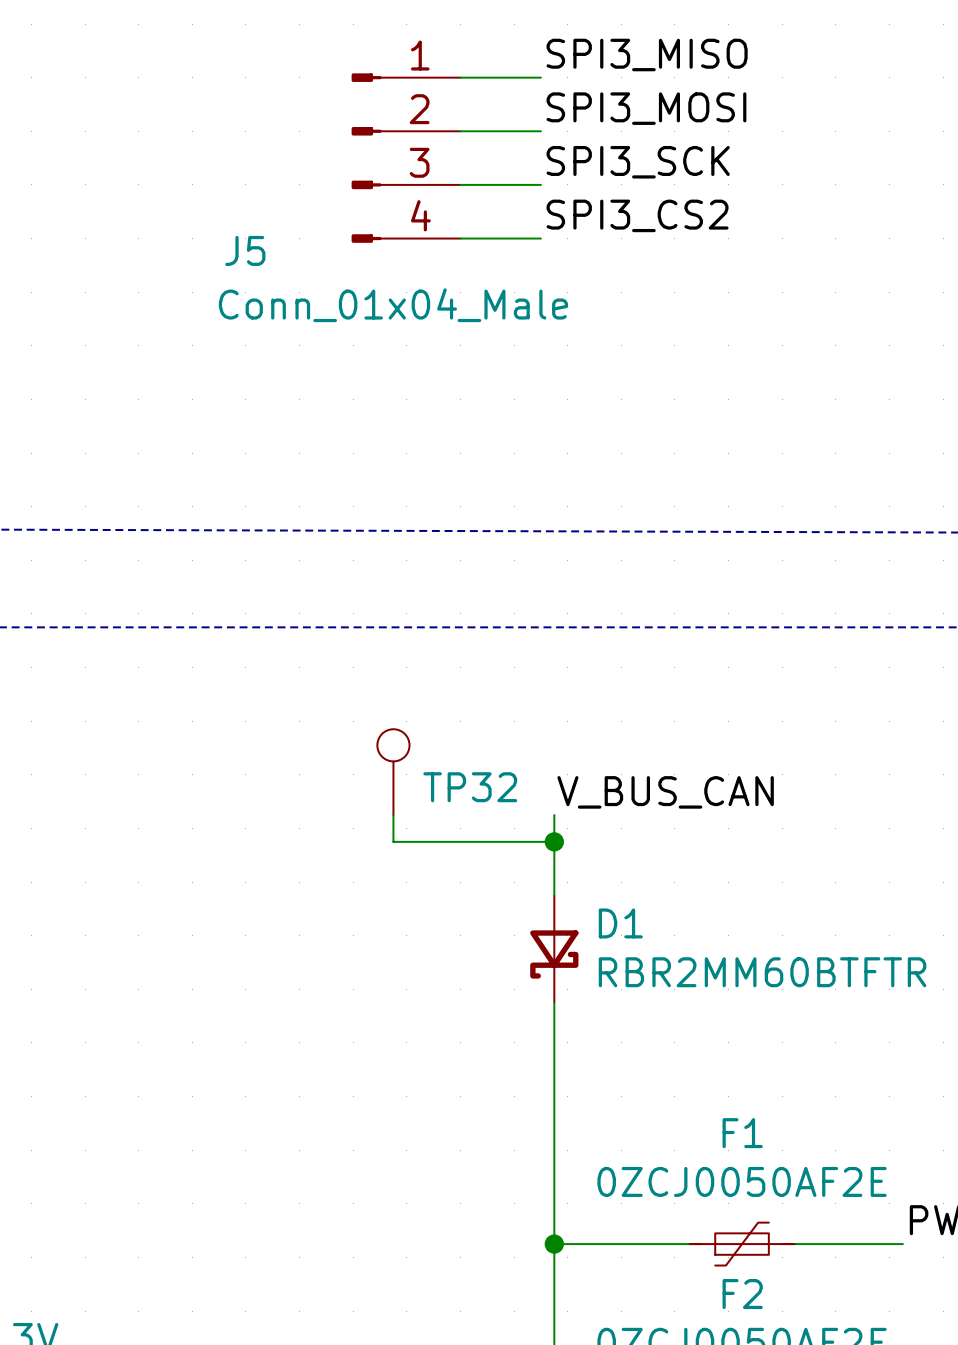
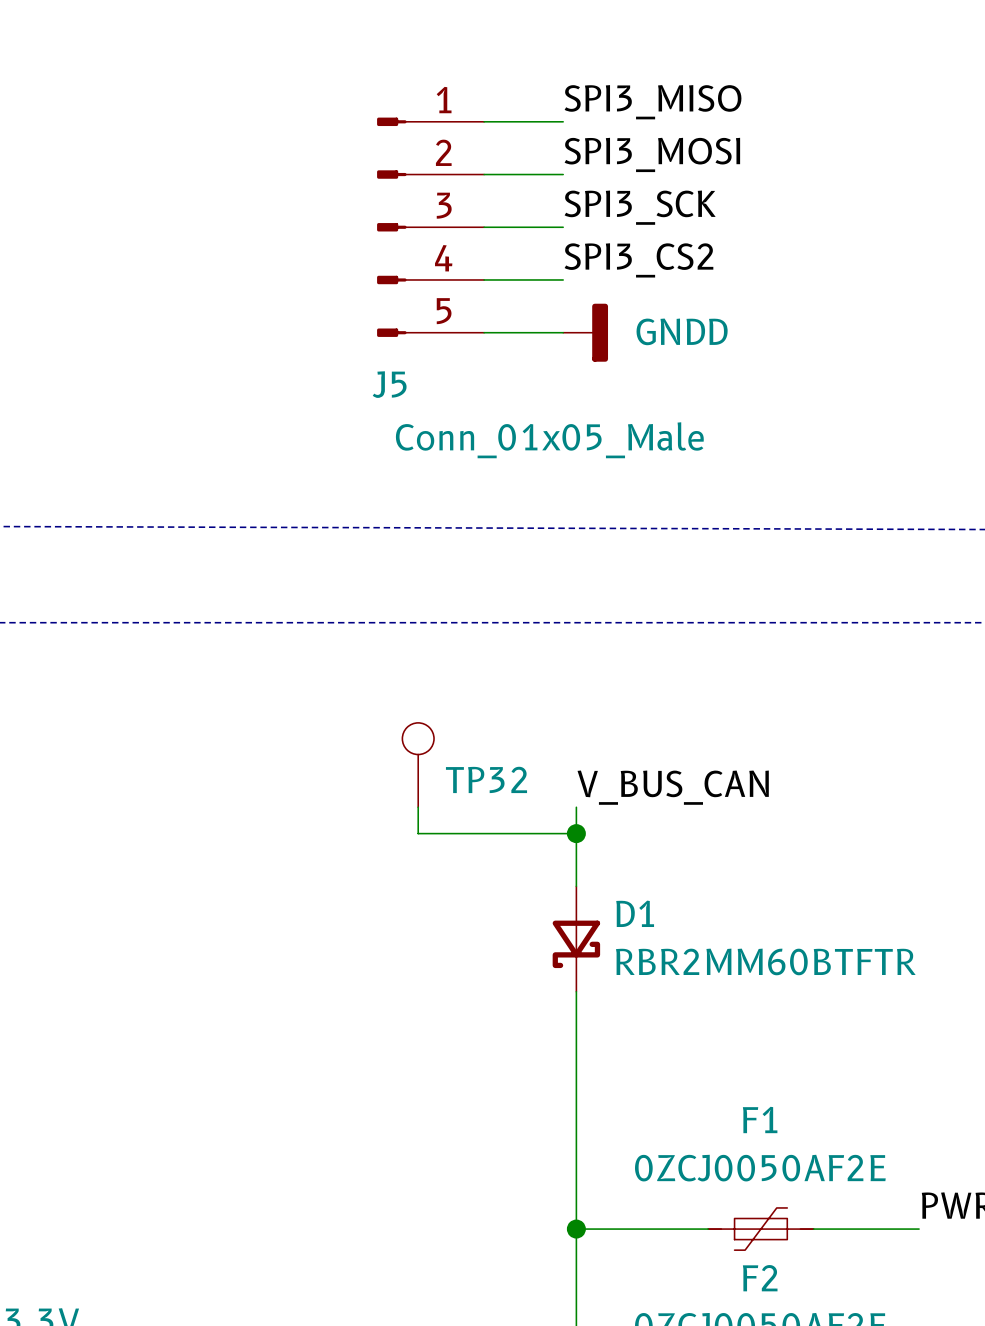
label position: SPI3_MISO (647, 55) -> SPI3_MISO (653, 102)
J5 symbol: [351, 73, 461, 243] -> [377, 117, 485, 337]
wire: (460, 77) (540, 77) -> (484, 121) (563, 121)
label position: SPI3_MOSI (646, 108) -> SPI3_MOSI (652, 154)
wire: (460, 131) (540, 131) -> (484, 174) (563, 174)
label position: SPI3_SCK (638, 162) -> SPI3_SCK (640, 207)
wire: (460, 184) (540, 184) -> (484, 227) (563, 227)
label position: SPI3_CS2 (637, 215) -> SPI3_CS2 (638, 260)
wire: (460, 238) (540, 238) -> (484, 279) (563, 279)
J5 name position: J5 (245, 250) -> J5 (389, 384)
J5 value: Conn_01x04_Male (393, 305) -> Conn_01x05_Male (549, 440)
wire: none -> (484, 332) (563, 332)
power symbol: none -> GNDD (585, 332)

